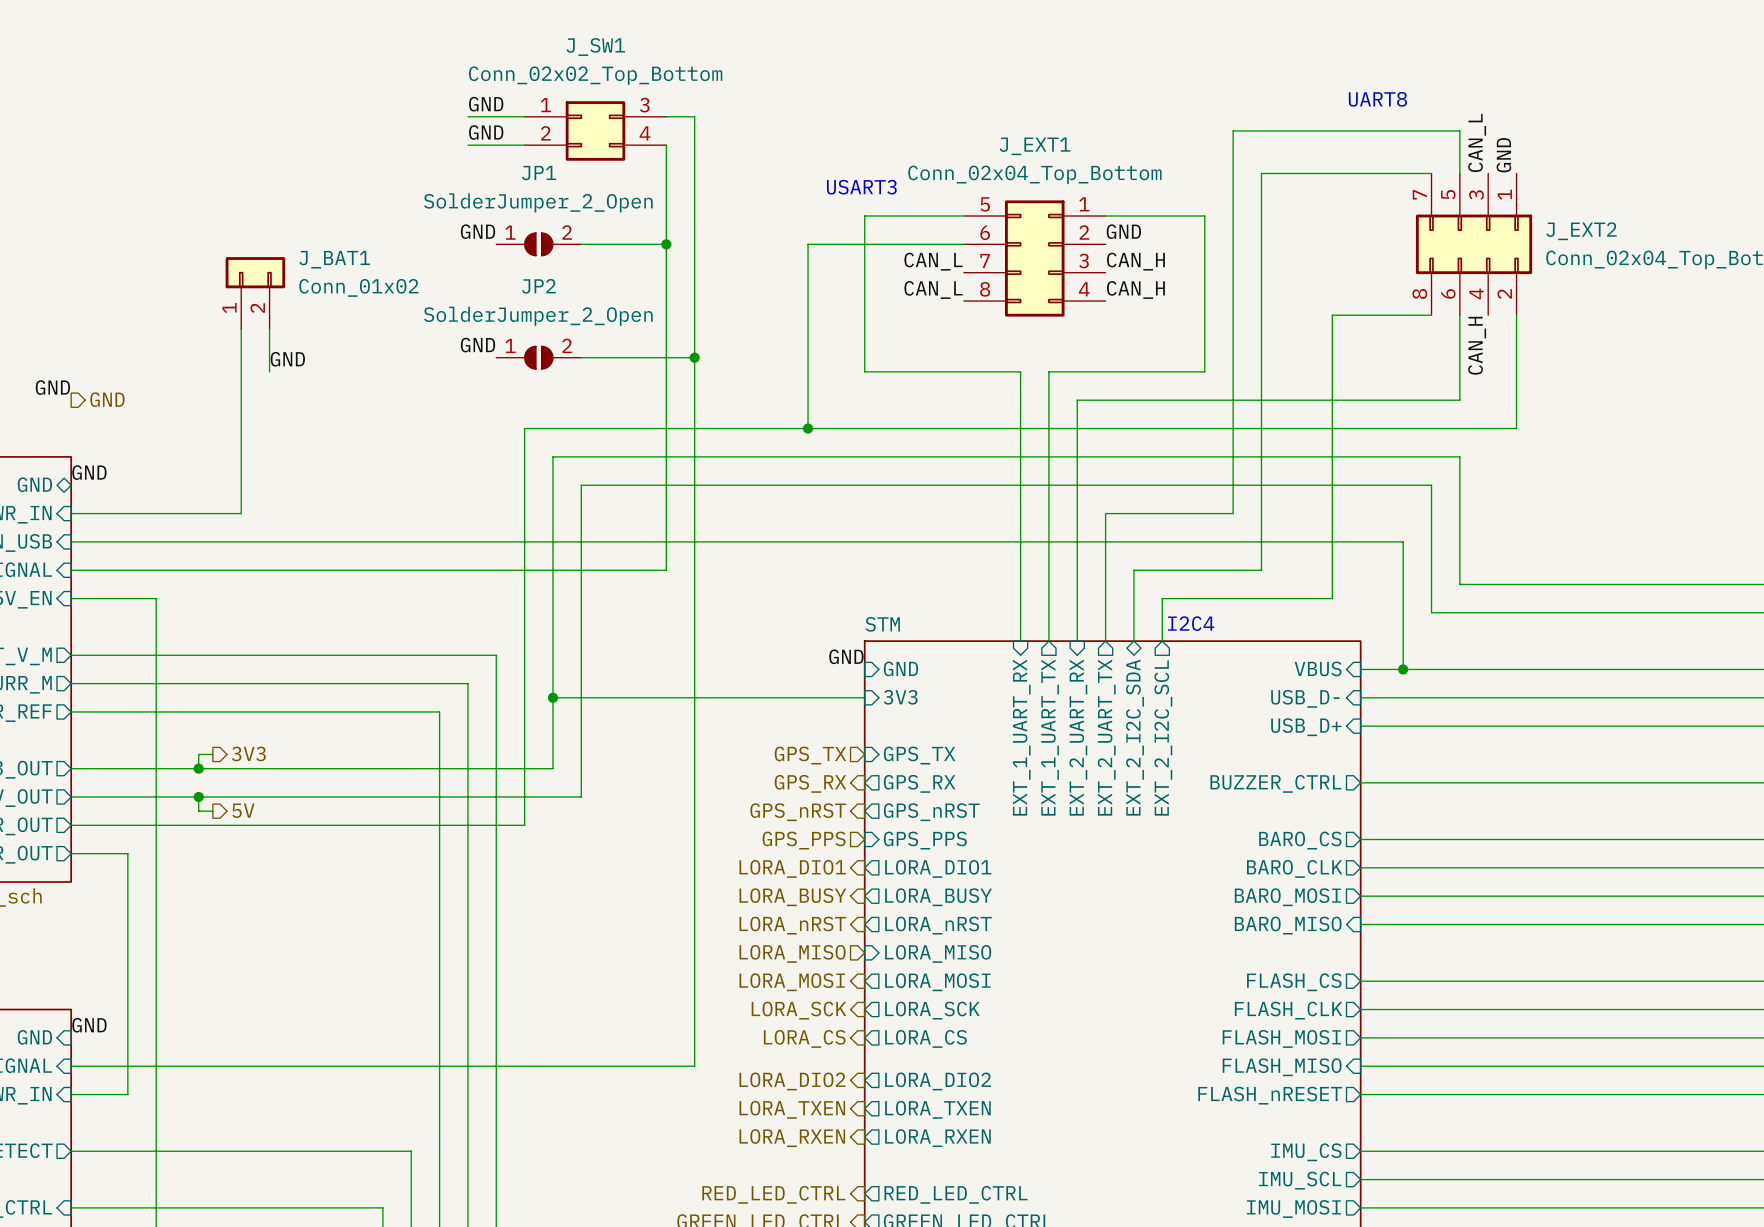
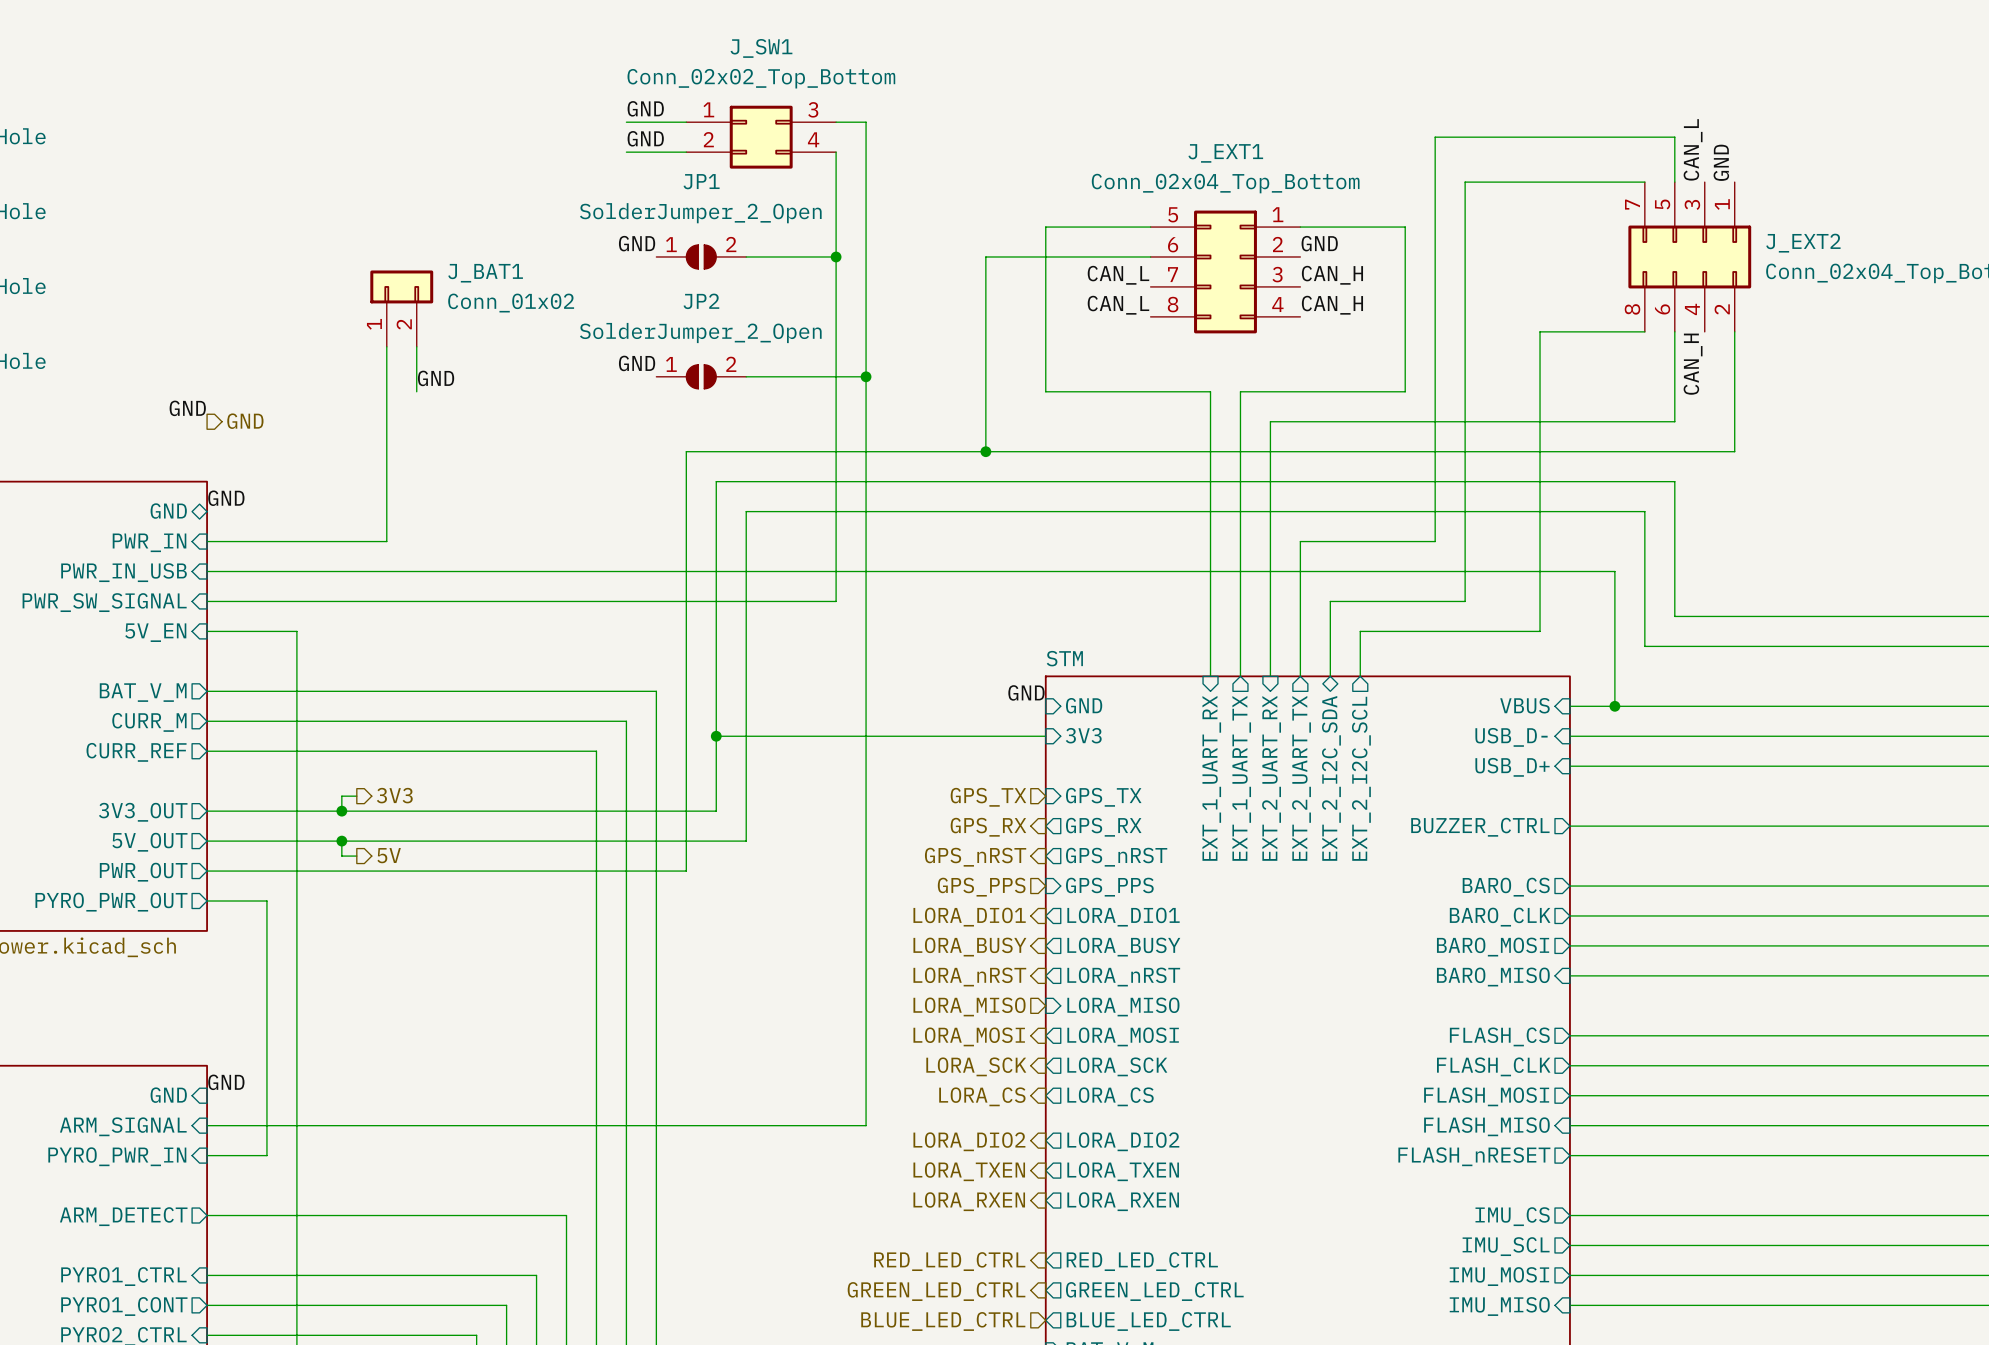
text: UART8 (1377, 99) -> none
text: USART3 (861, 187) -> none
text: I2C4 (1191, 623) -> none

